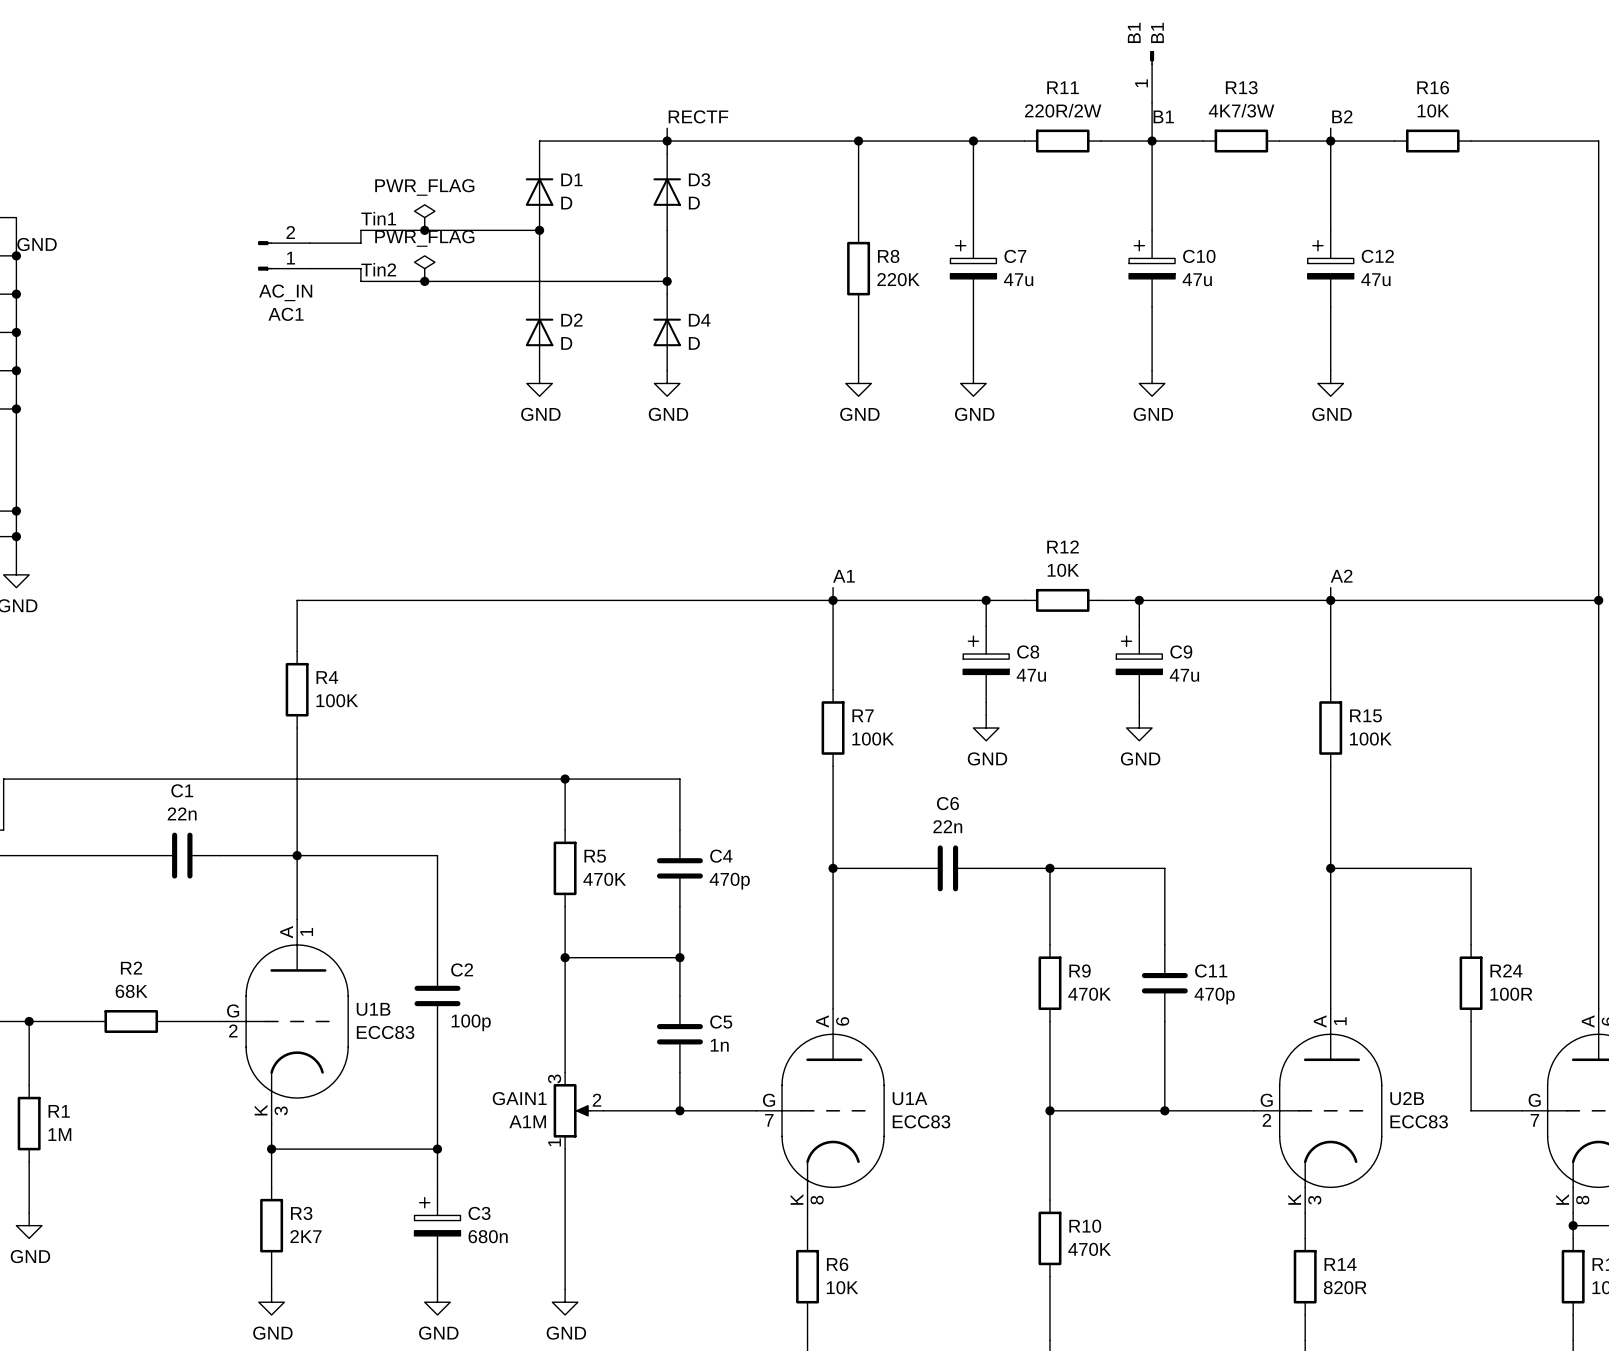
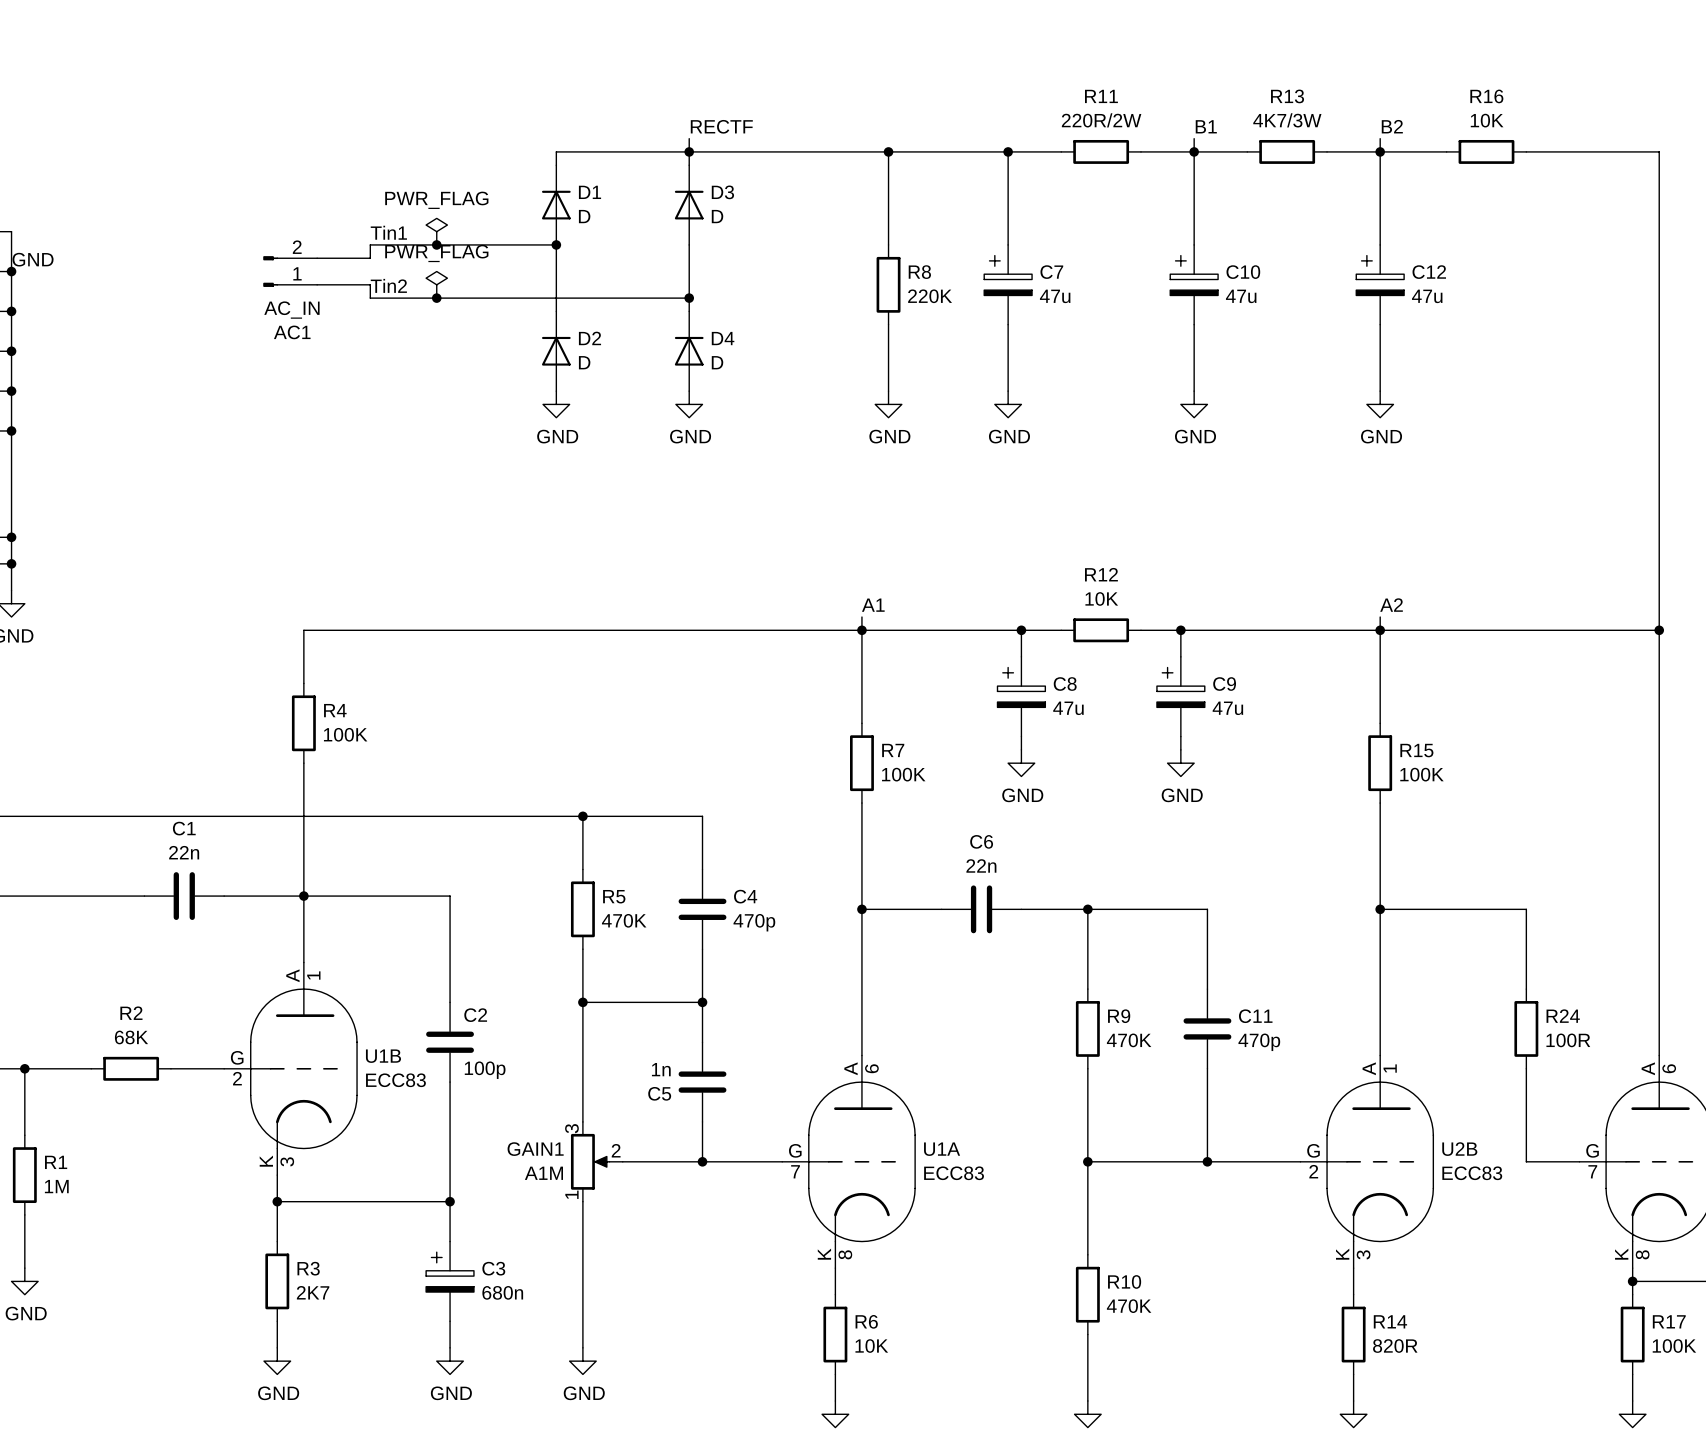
B1: B1 (1152, 76) -> none
wire: (1152, 102) (1152, 128) -> none
C5 name position: C5 (721, 1022) -> C5 (659, 1093)
C5 value position: 1n (719, 1045) -> 1n (661, 1069)

